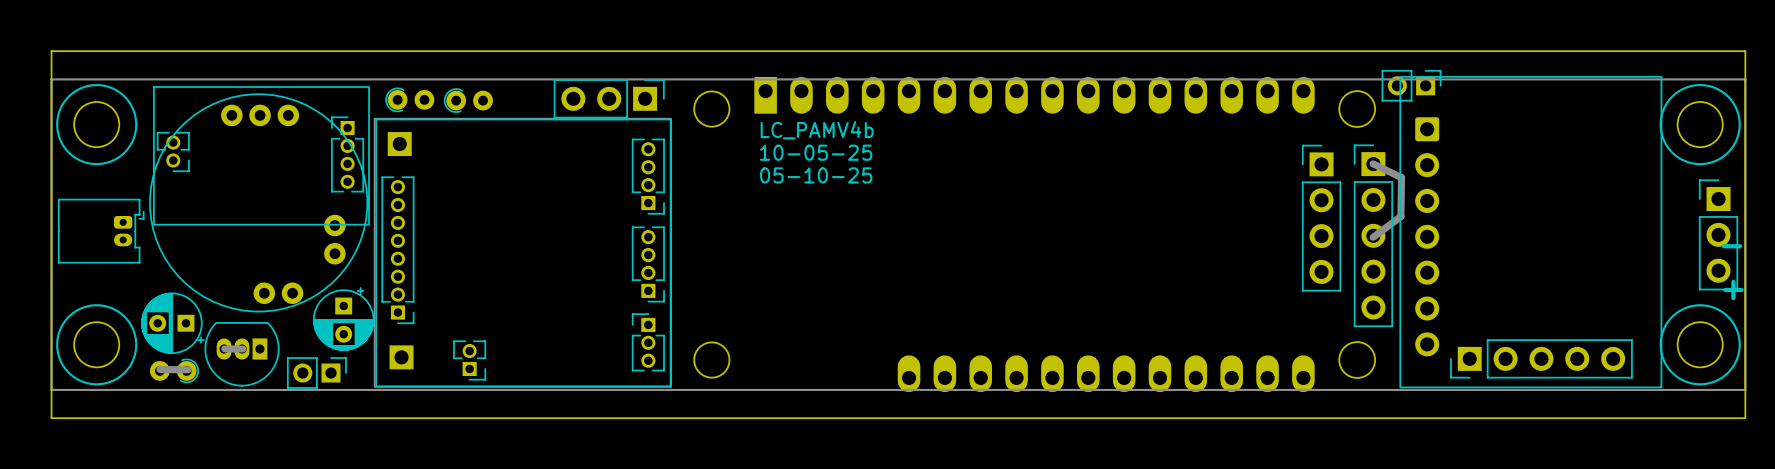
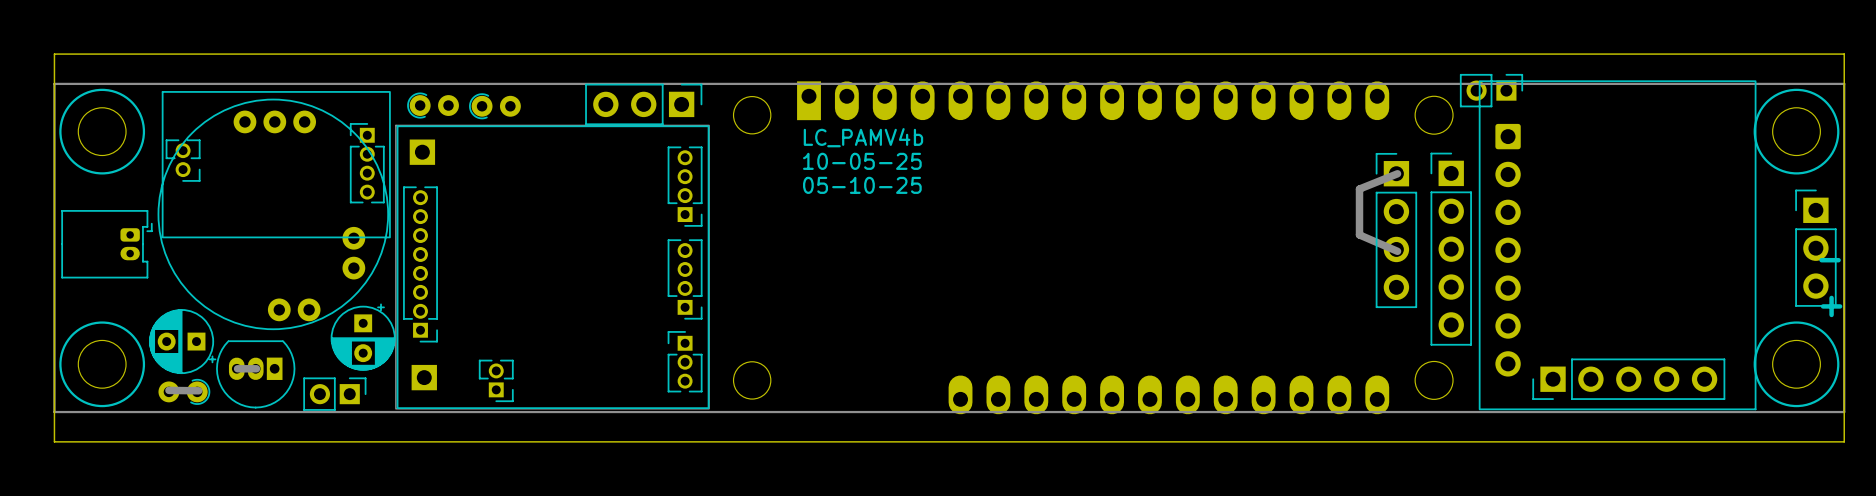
line: (1373, 163) (1401, 177) (1400, 216) (1373, 237) -> none
line: none -> (1397, 173) (1359, 189) (1359, 234) (1397, 251)

